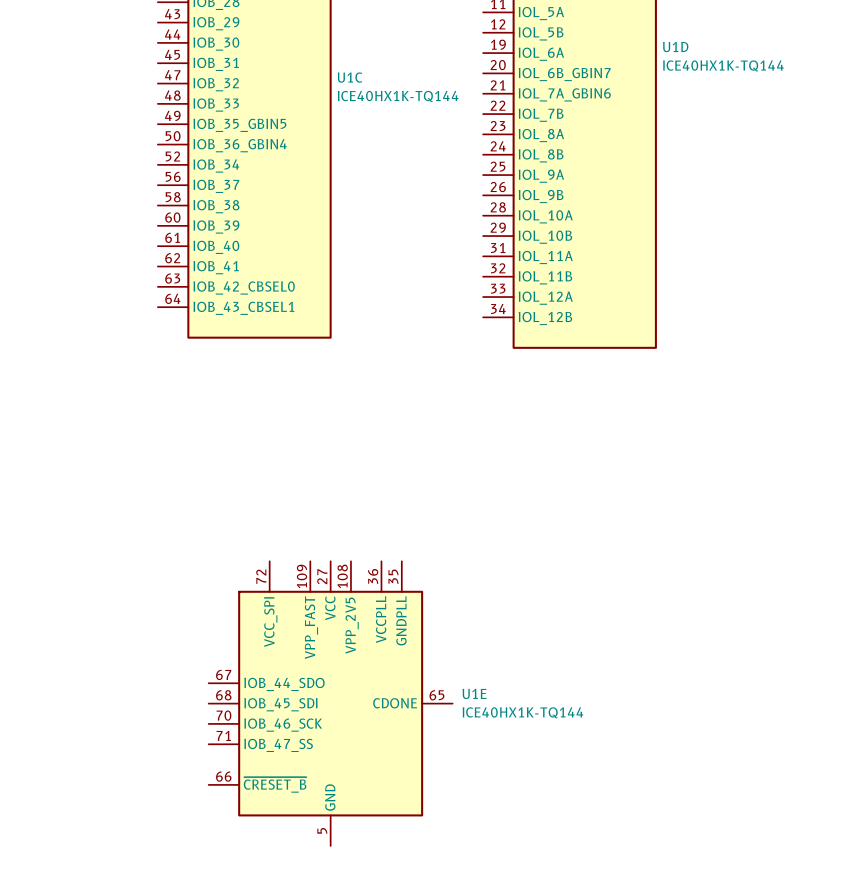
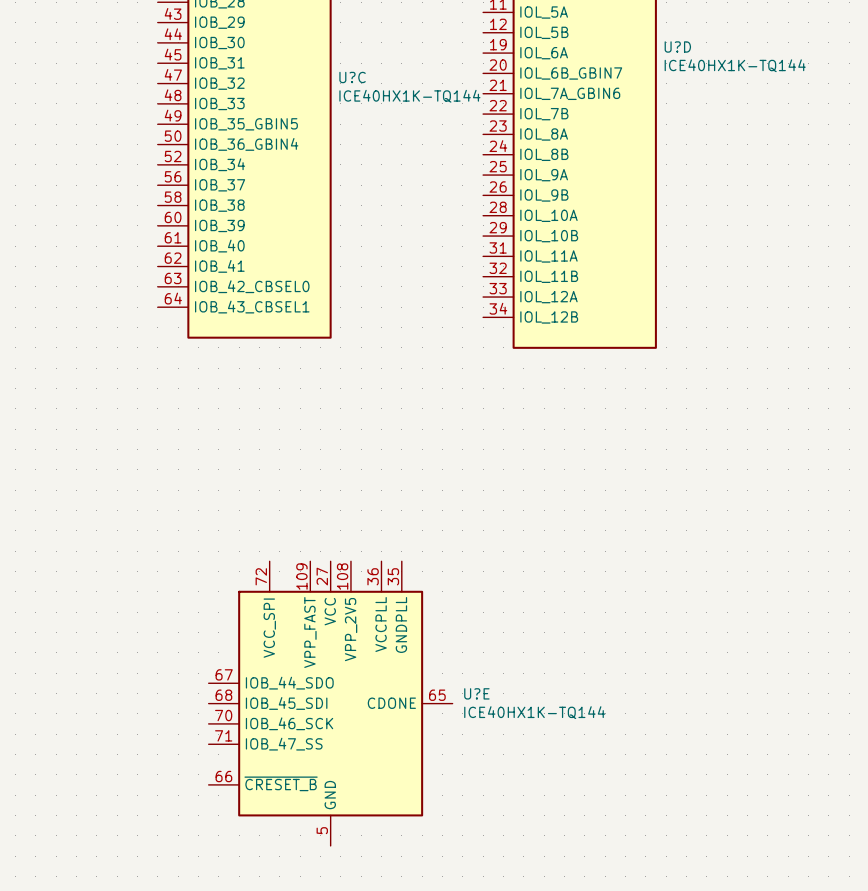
U1D name: U1D (675, 47) -> U?D (677, 46)
U1C name: U1C (350, 77) -> U?C (352, 77)
U1E name: U1E (474, 693) -> U?E (476, 693)

